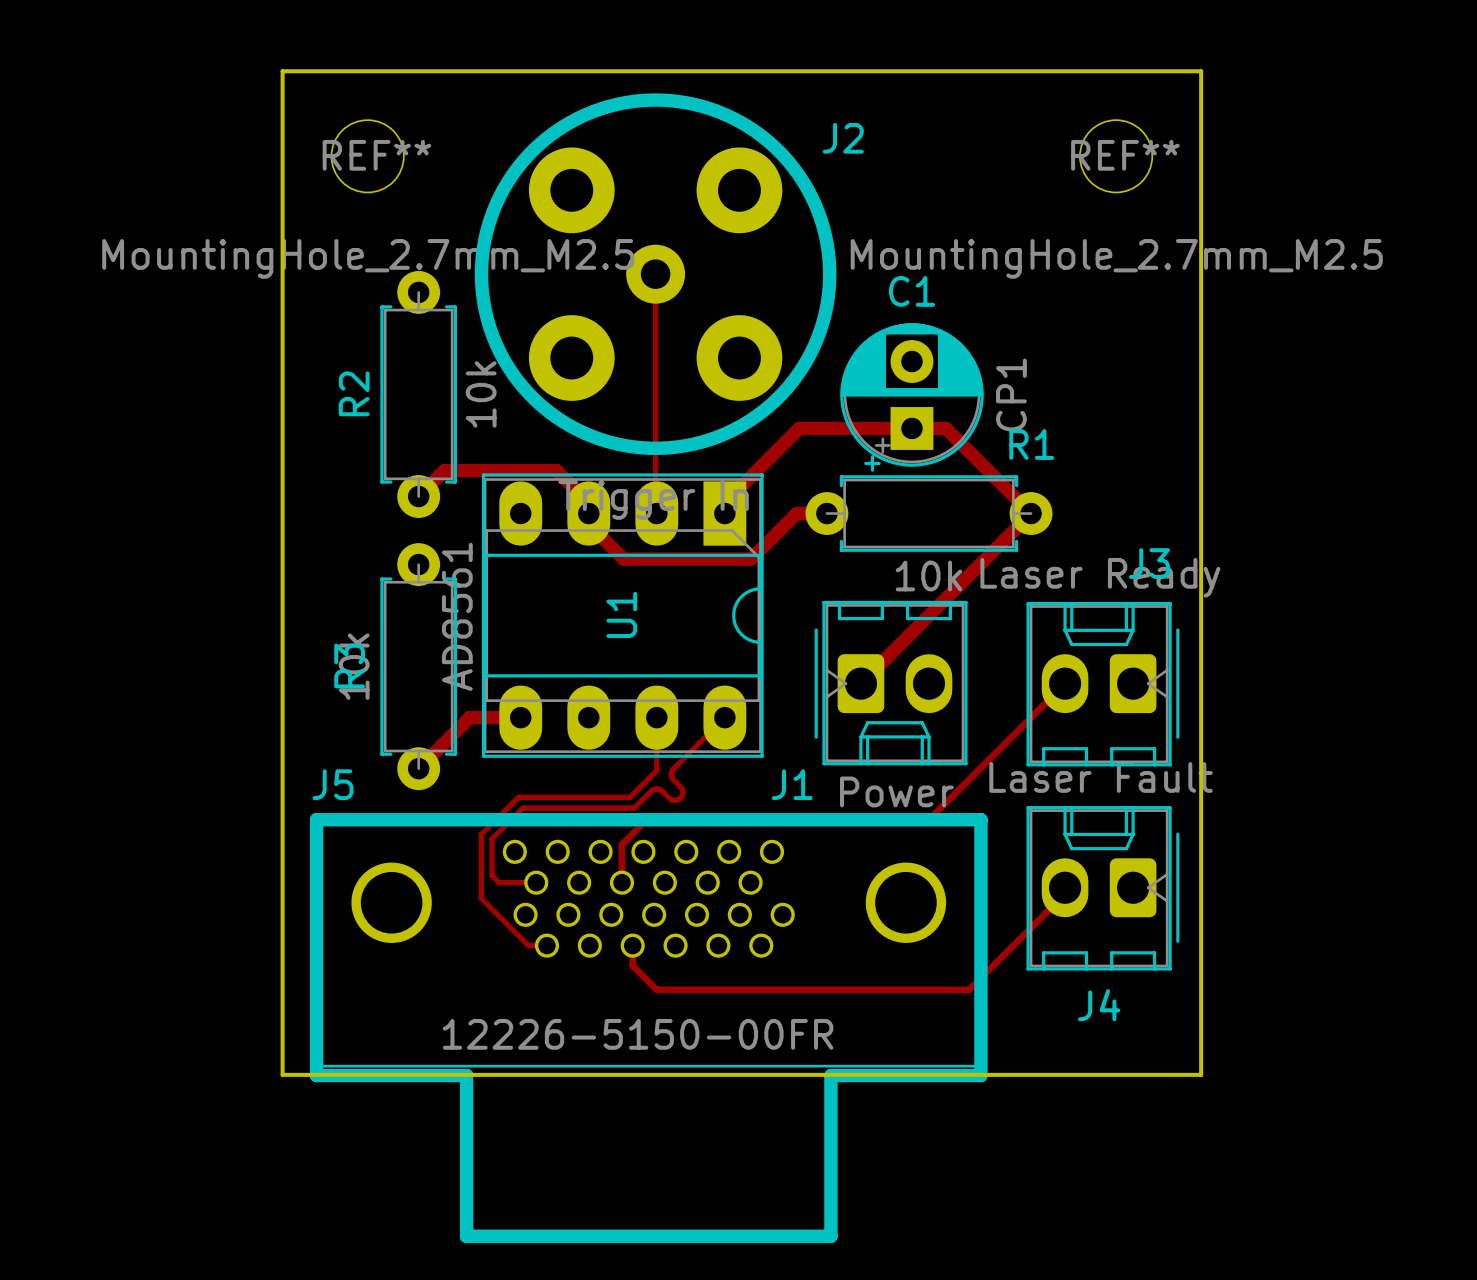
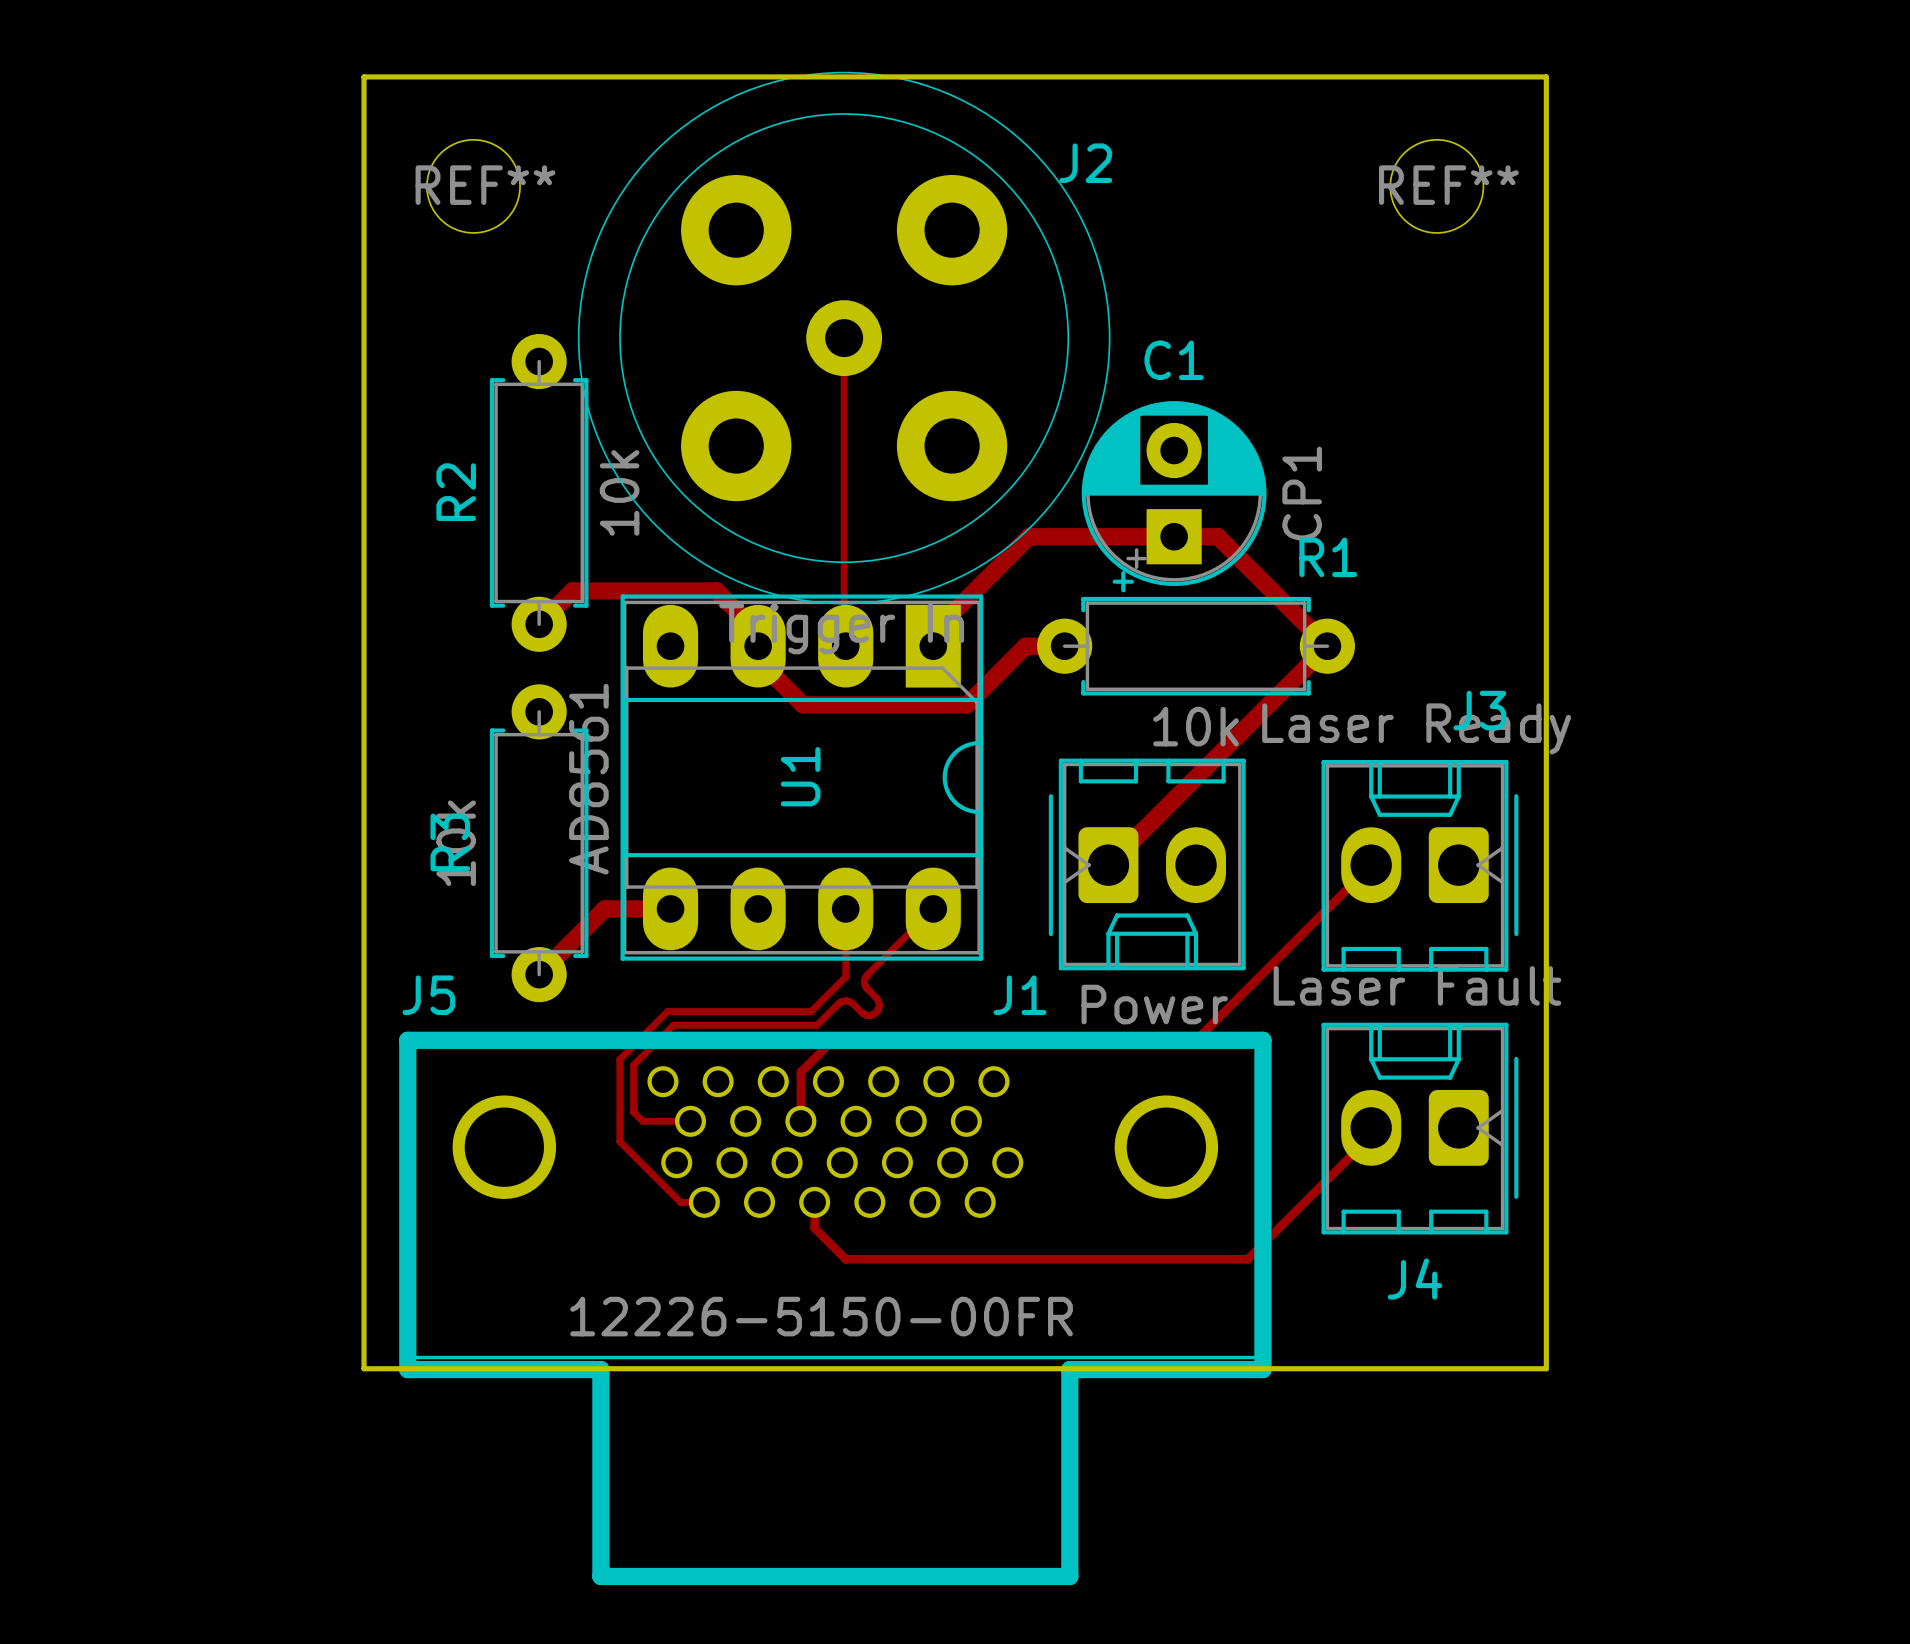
J2 footprint: [474, 93, 837, 456] -> [578, 72, 1110, 604]
REF** value: MountingHole_2.7mm_M2.5 (368, 258) -> none
REF** value: MountingHole_2.7mm_M2.5 (1116, 258) -> none

